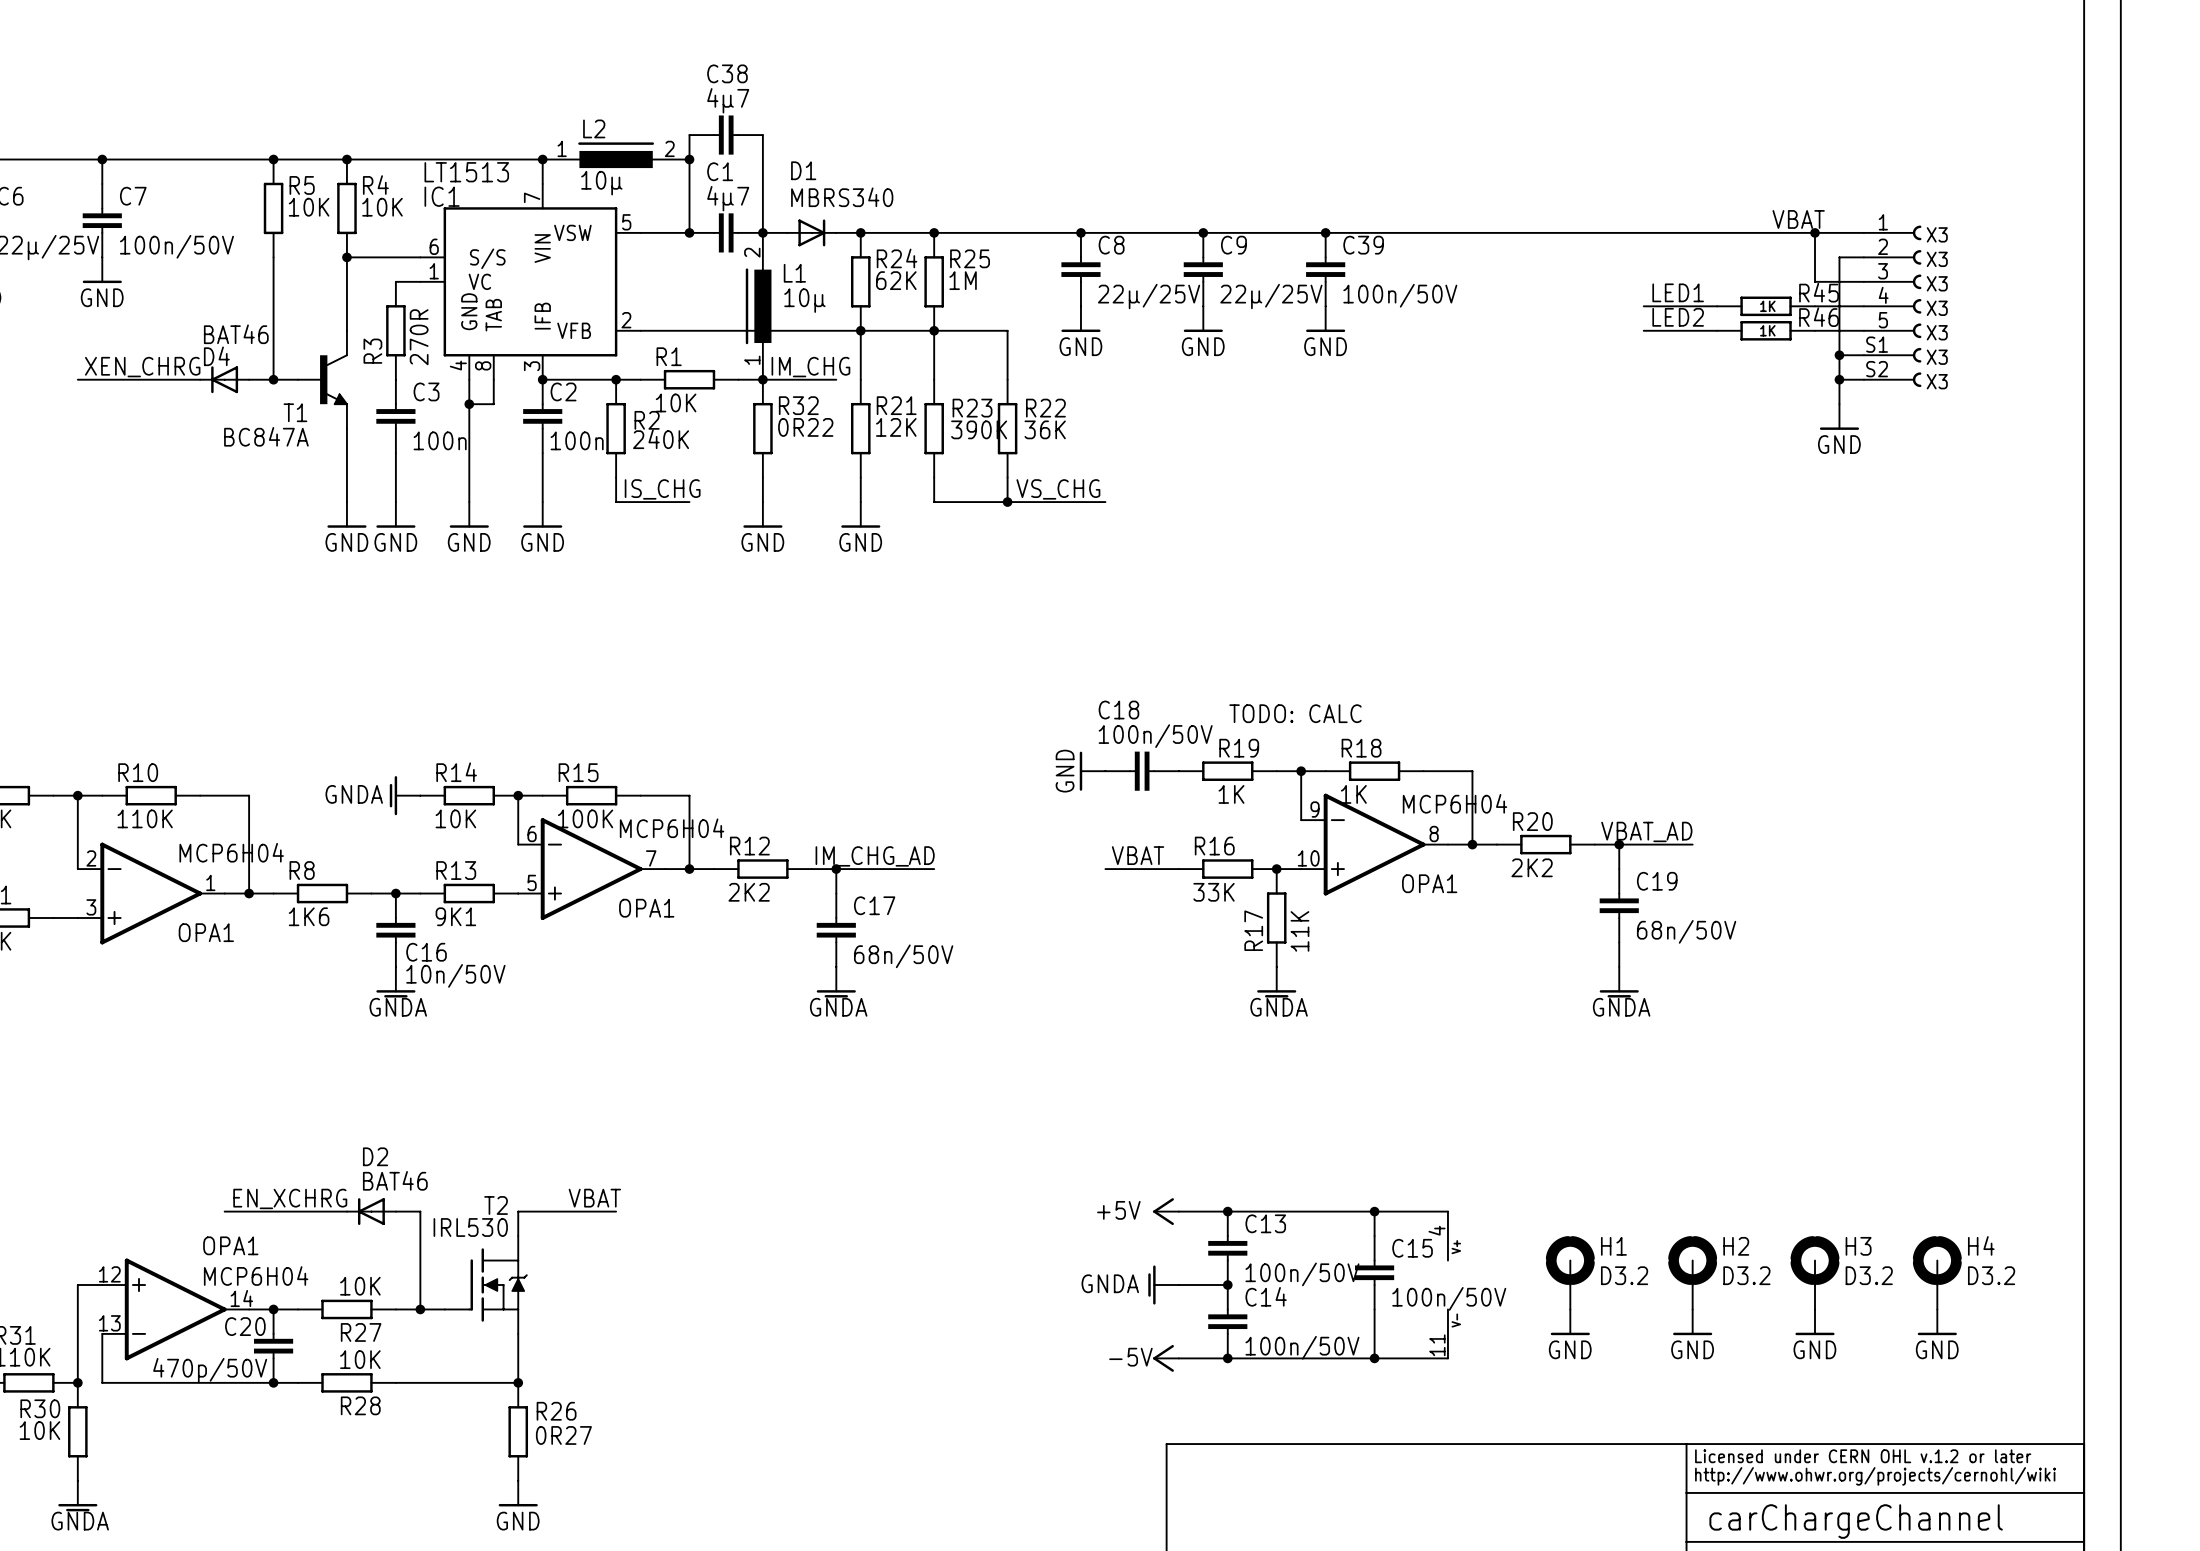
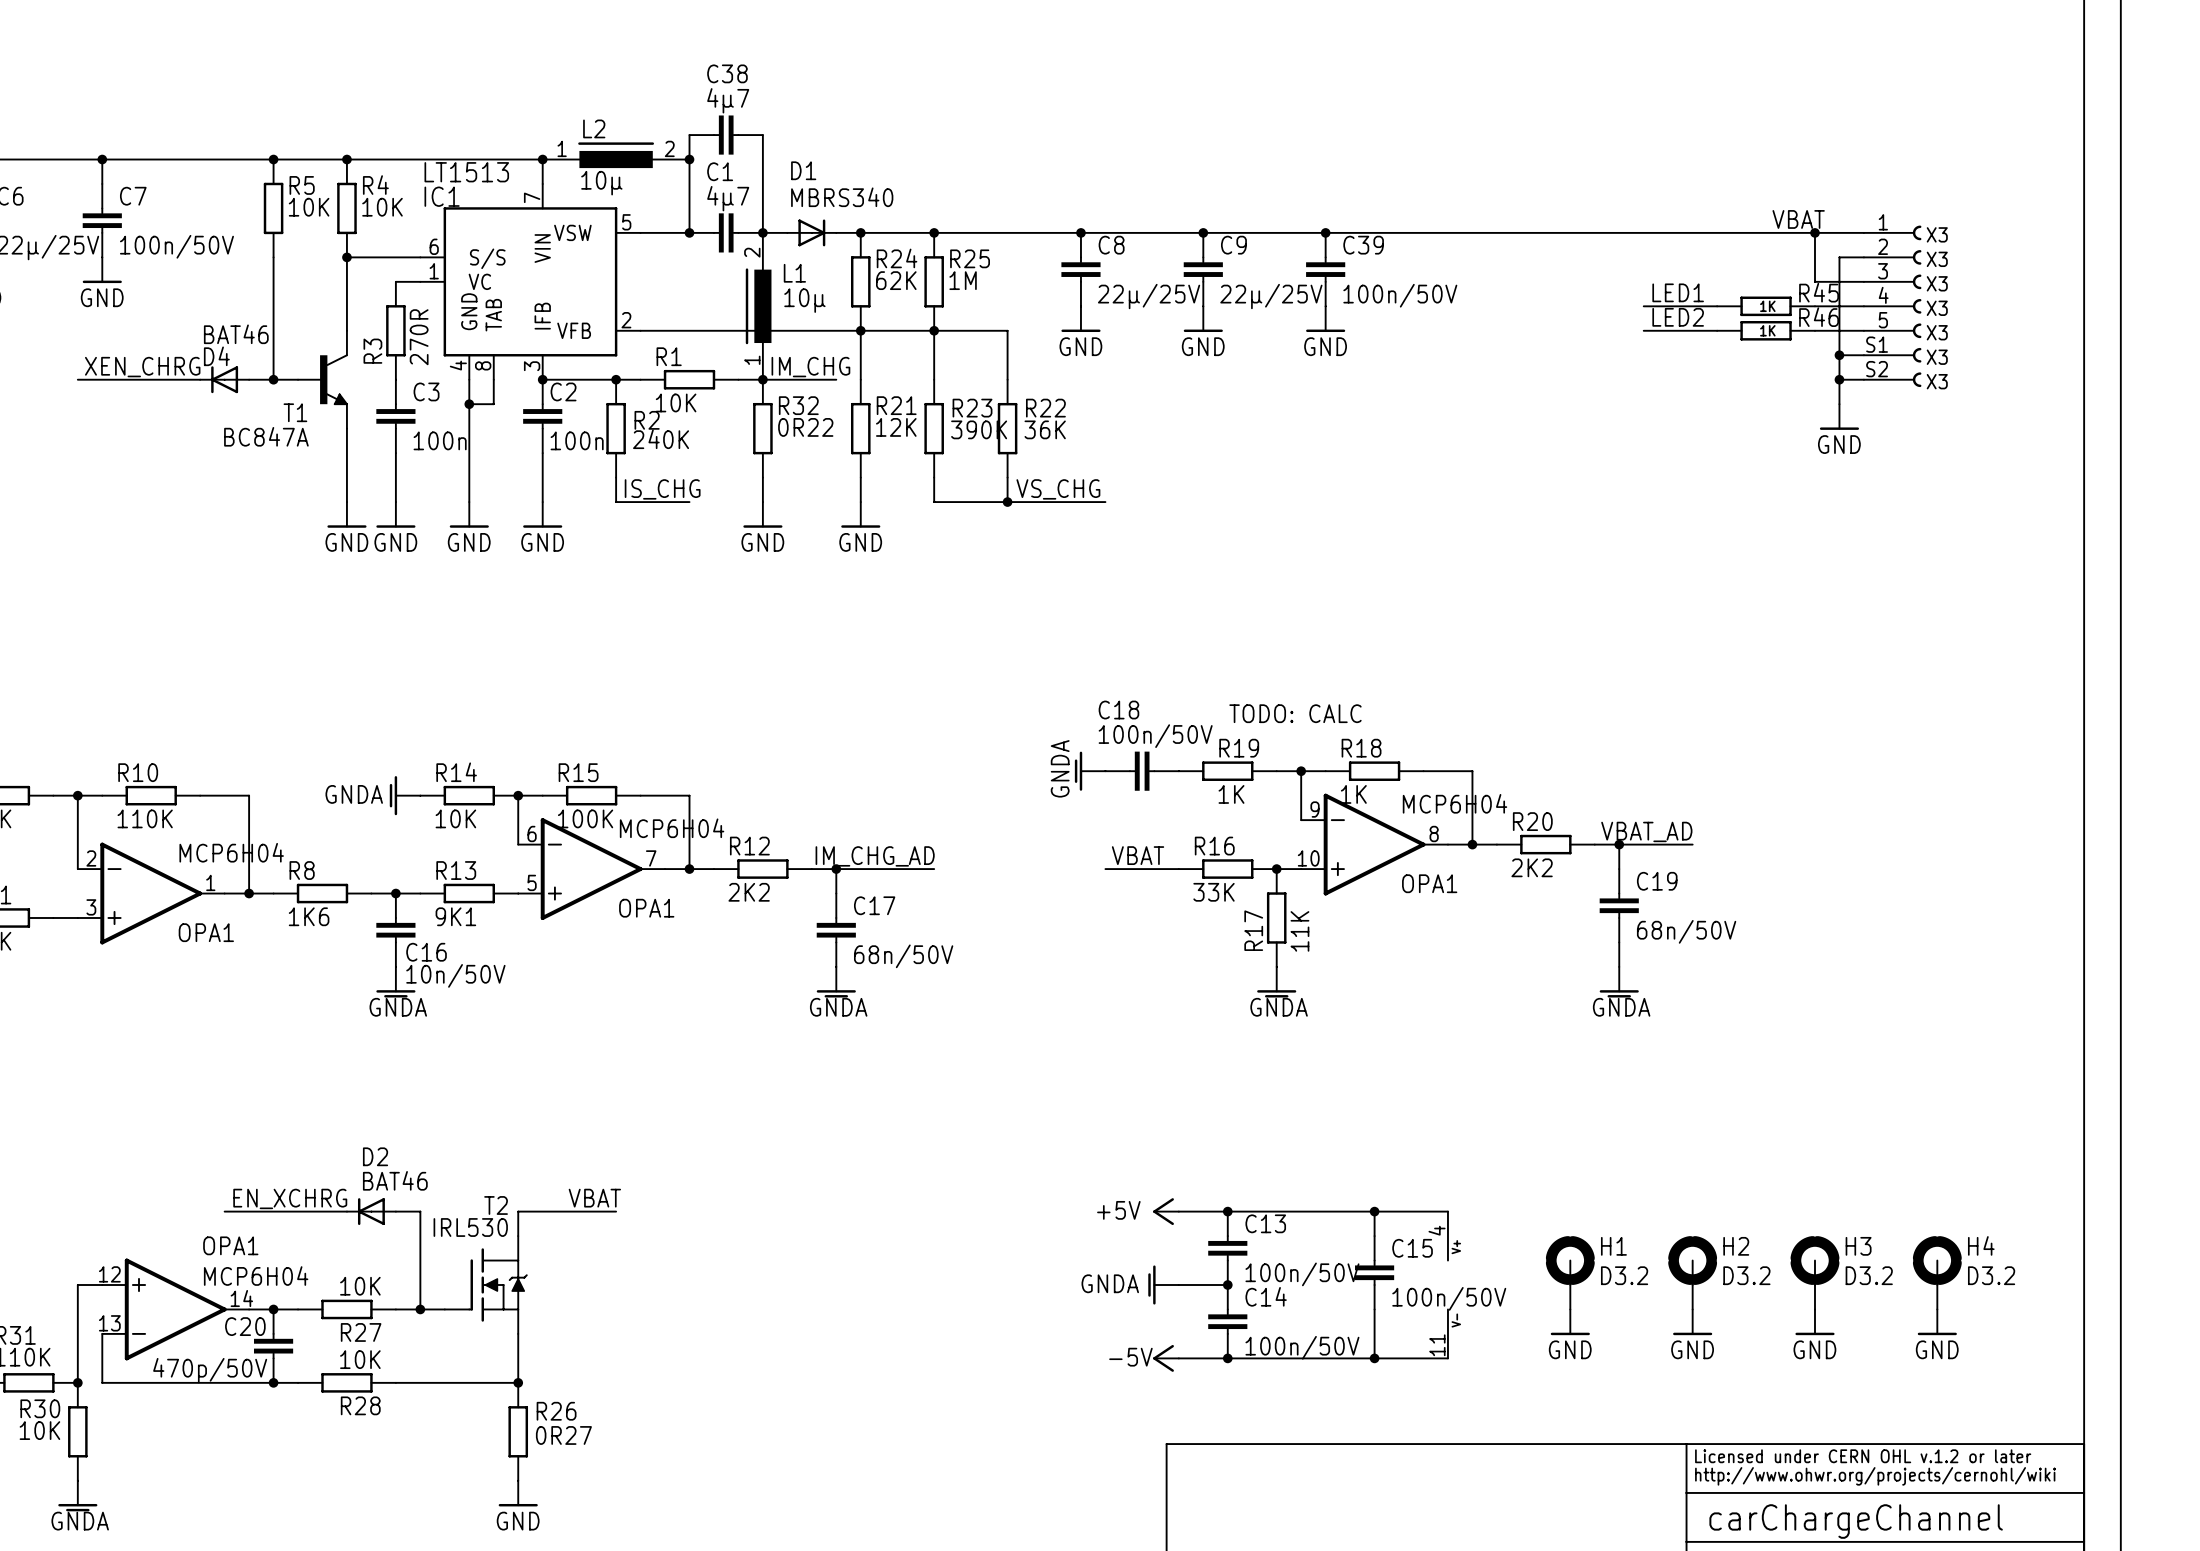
power symbol: GND (1092, 771) -> GNDA (1090, 771)

